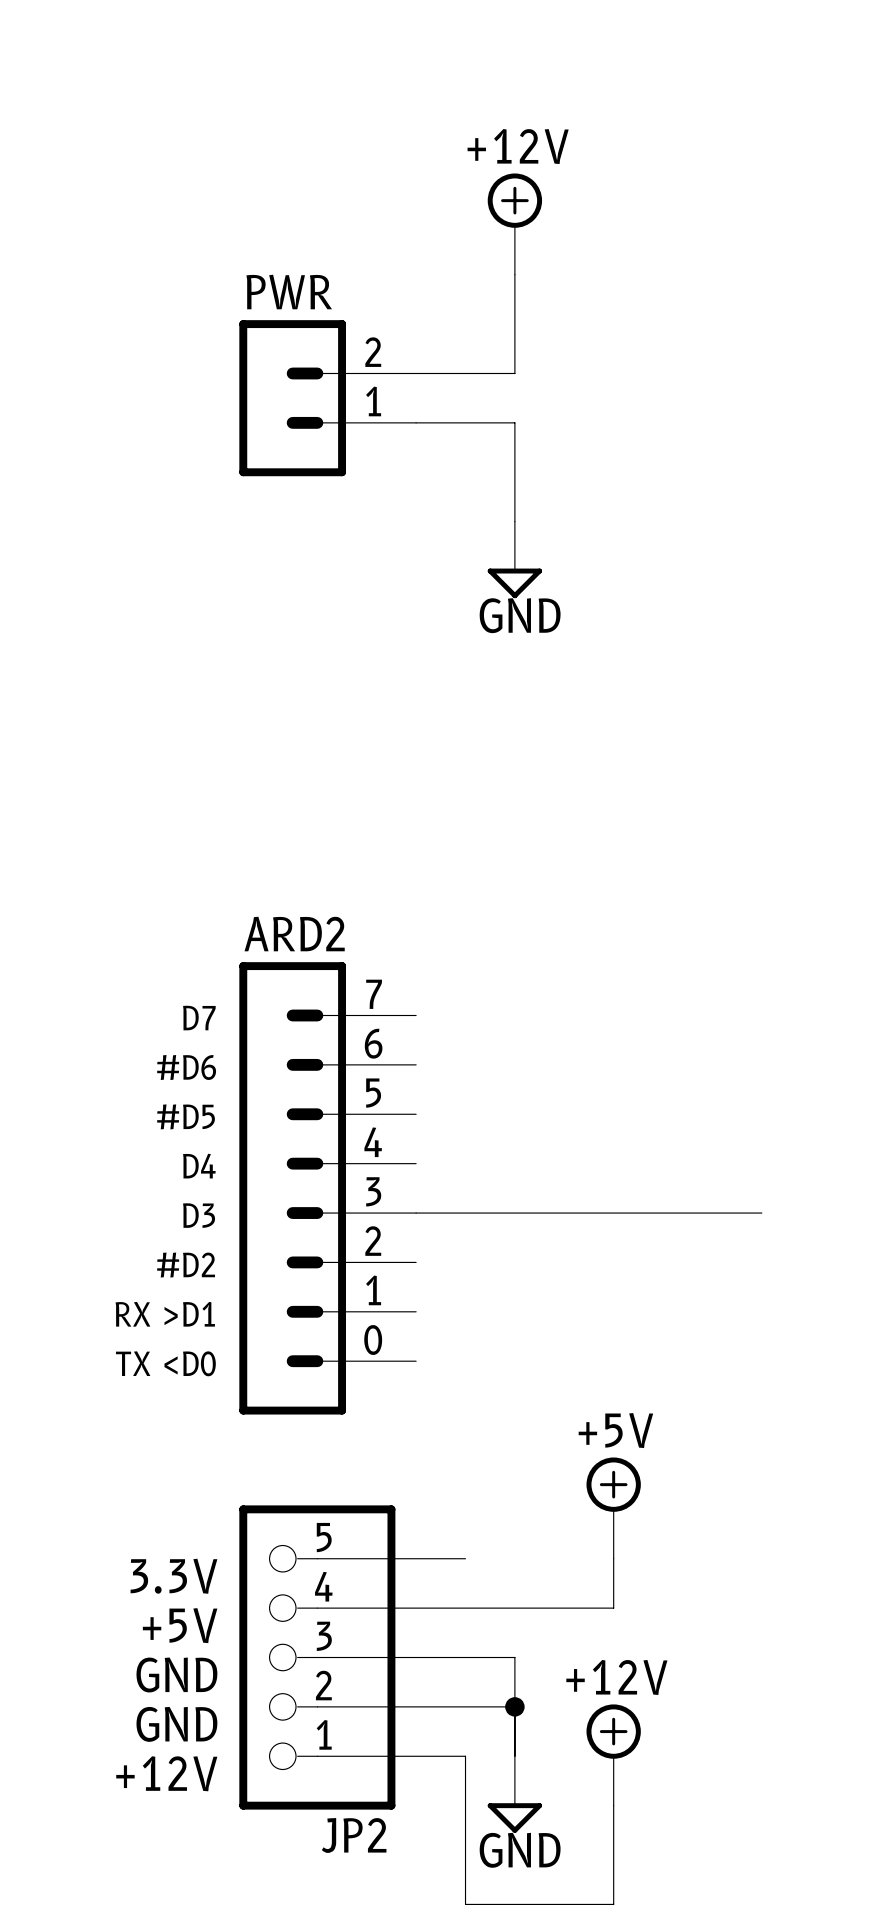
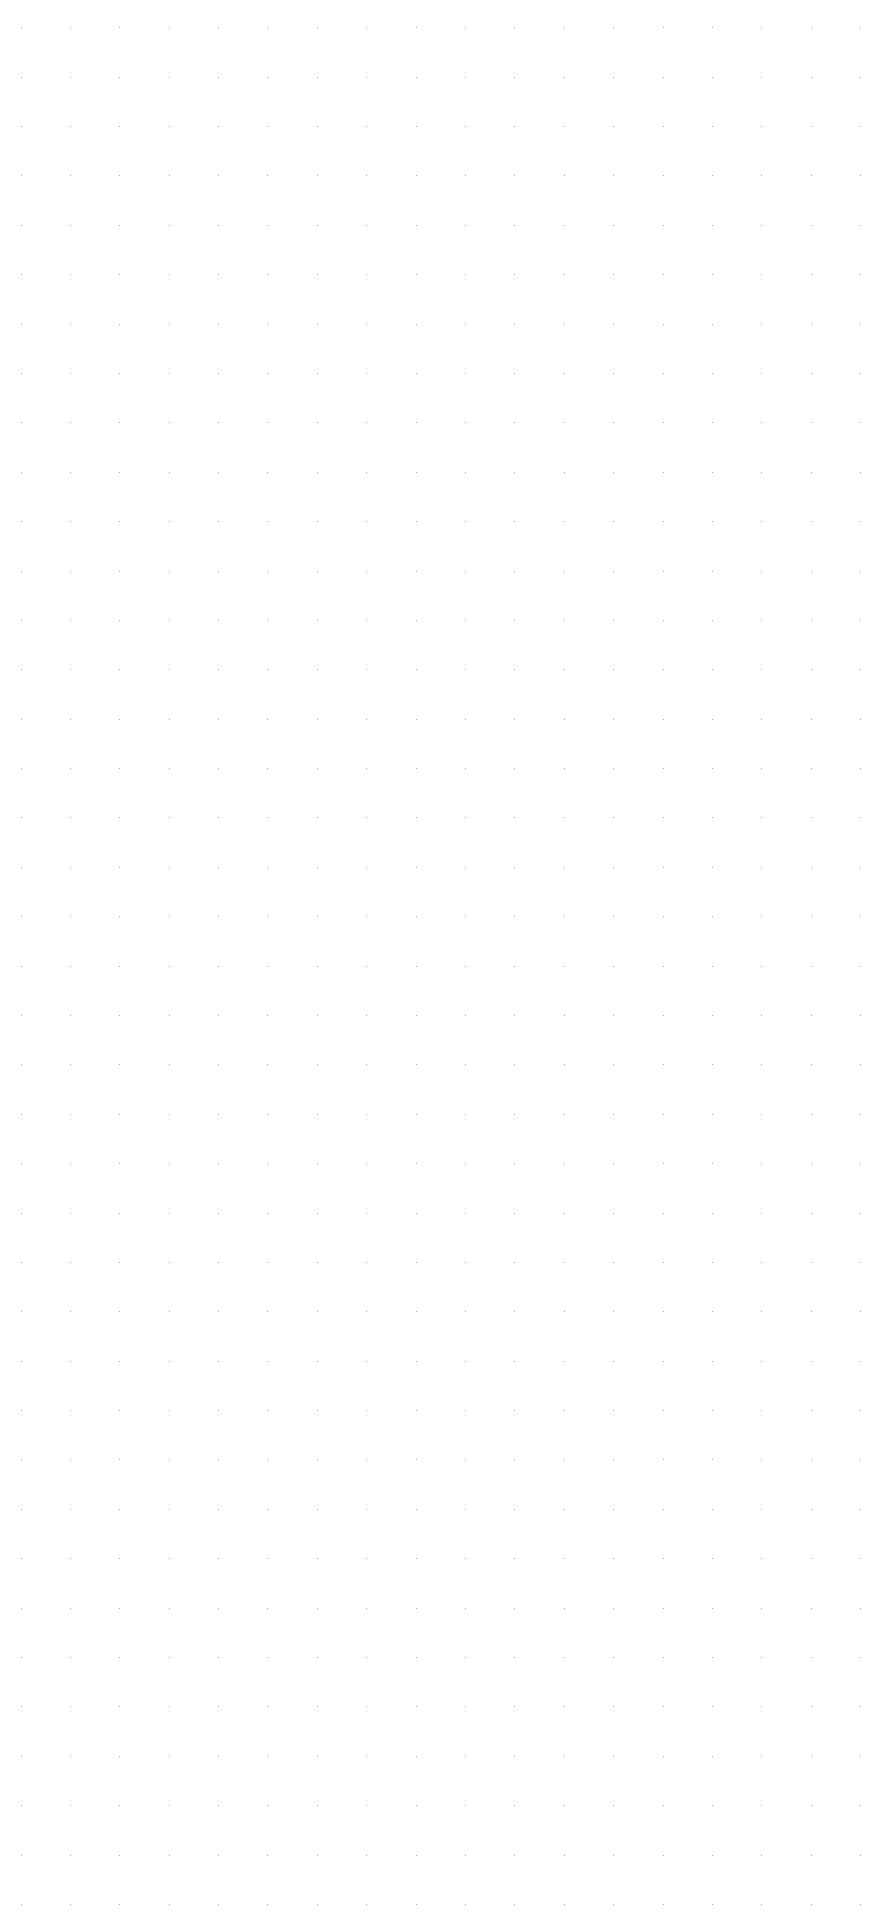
power symbol: +12V (514, 224) -> none
wire: (514, 274) (514, 373) (416, 373) -> none
PWR: (327, 398) -> none
wire: (416, 422) (514, 422) (514, 521) -> none
power symbol: GND (514, 559) -> none
ARD2: (327, 1188) -> none
wire: (416, 1213) (761, 1213) -> none
power symbol: +5V (613, 1508) -> none
wire: (317, 1558) (465, 1558) -> none
wire: (613, 1558) (613, 1608) (317, 1608) -> none
label: 3.3V (173, 1576) -> none
label: +5V (180, 1625) -> none
wire: (317, 1657) (514, 1657) (514, 1756) -> none
JP2: (317, 1657) -> none
label: GND (176, 1674) -> none
wire: (317, 1706) (514, 1706) -> none
junction: (514, 1706) -> none
label: GND (176, 1724) -> none
power symbol: +12V (613, 1755) -> none
wire: (317, 1756) (465, 1756) (465, 1904) (613, 1904) (613, 1805) -> none
label: +12V (166, 1773) -> none
power symbol: GND (514, 1794) -> none

